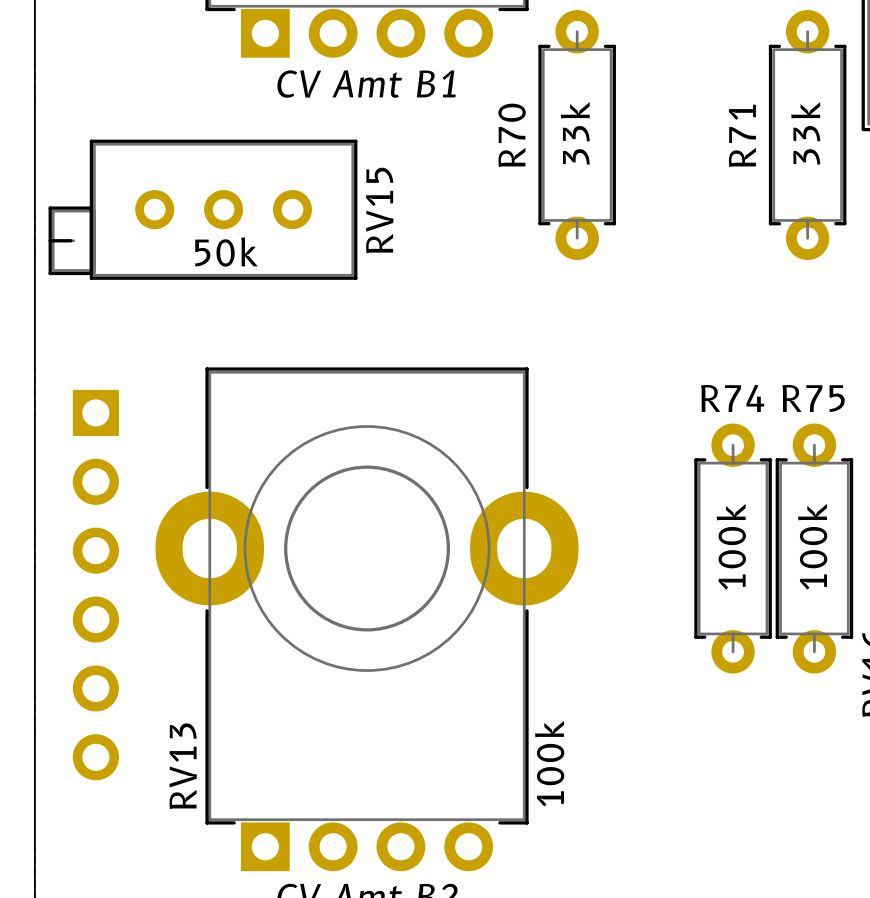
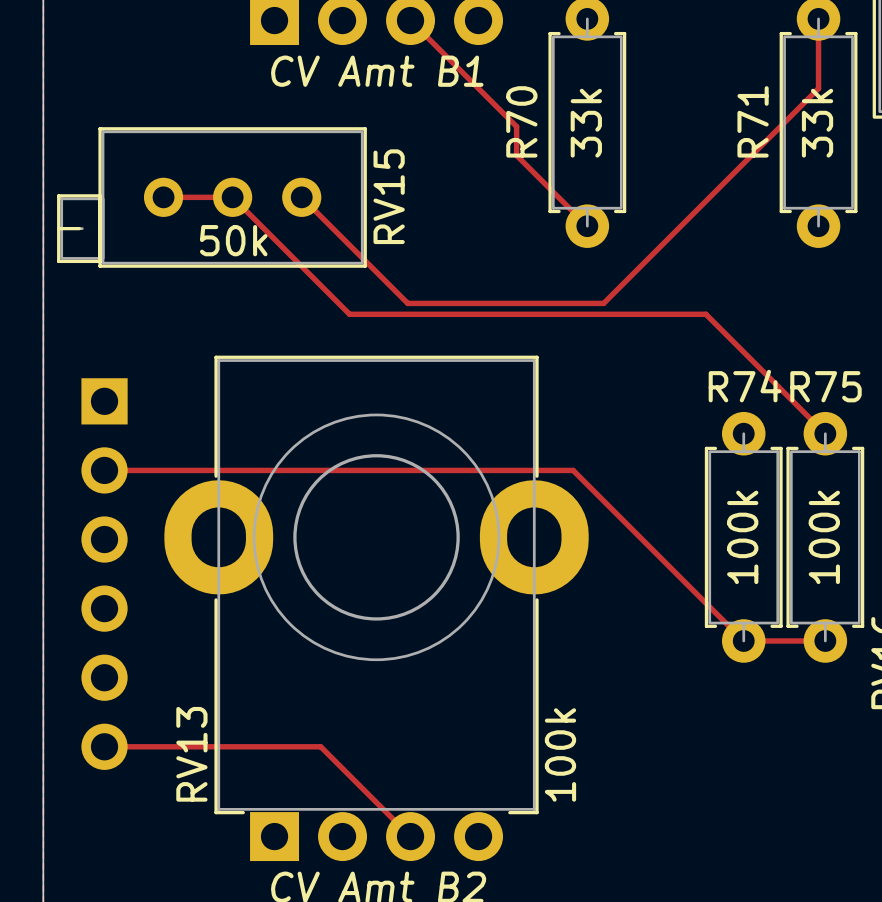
track: none -> (818, 18) (818, 88) (603, 303) (407, 303) (301, 197)
track: none -> (410, 20) (516, 126) (516, 155) (587, 226)
track: none -> (163, 197) (232, 197) (349, 314) (705, 314) (825, 433)
track: none -> (104, 470) (573, 470) (743, 640) (825, 640)
track: none -> (104, 746) (320, 746) (410, 836)

